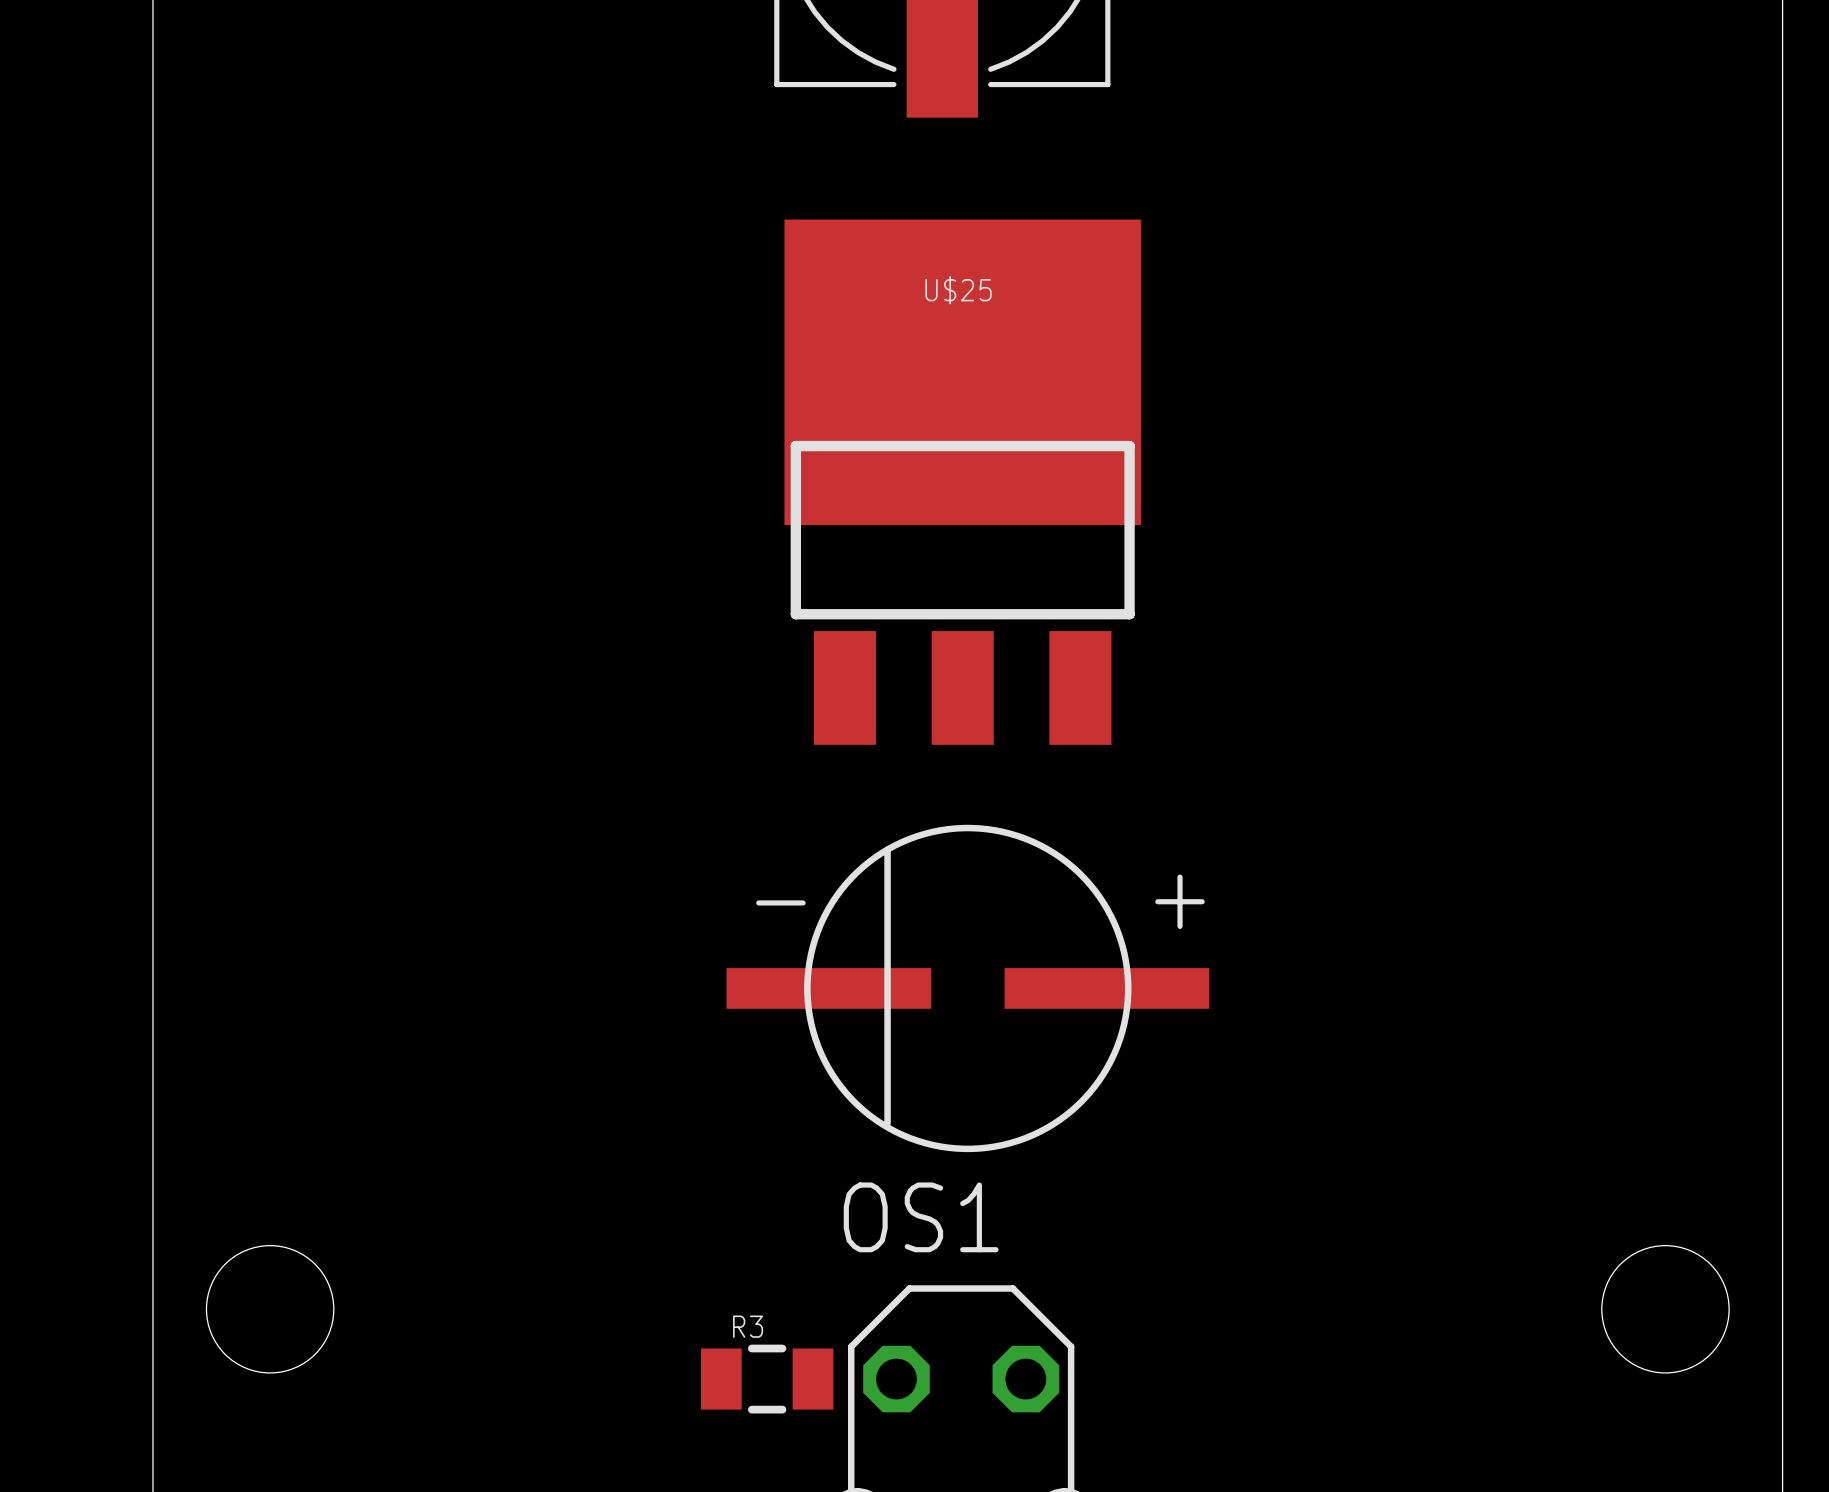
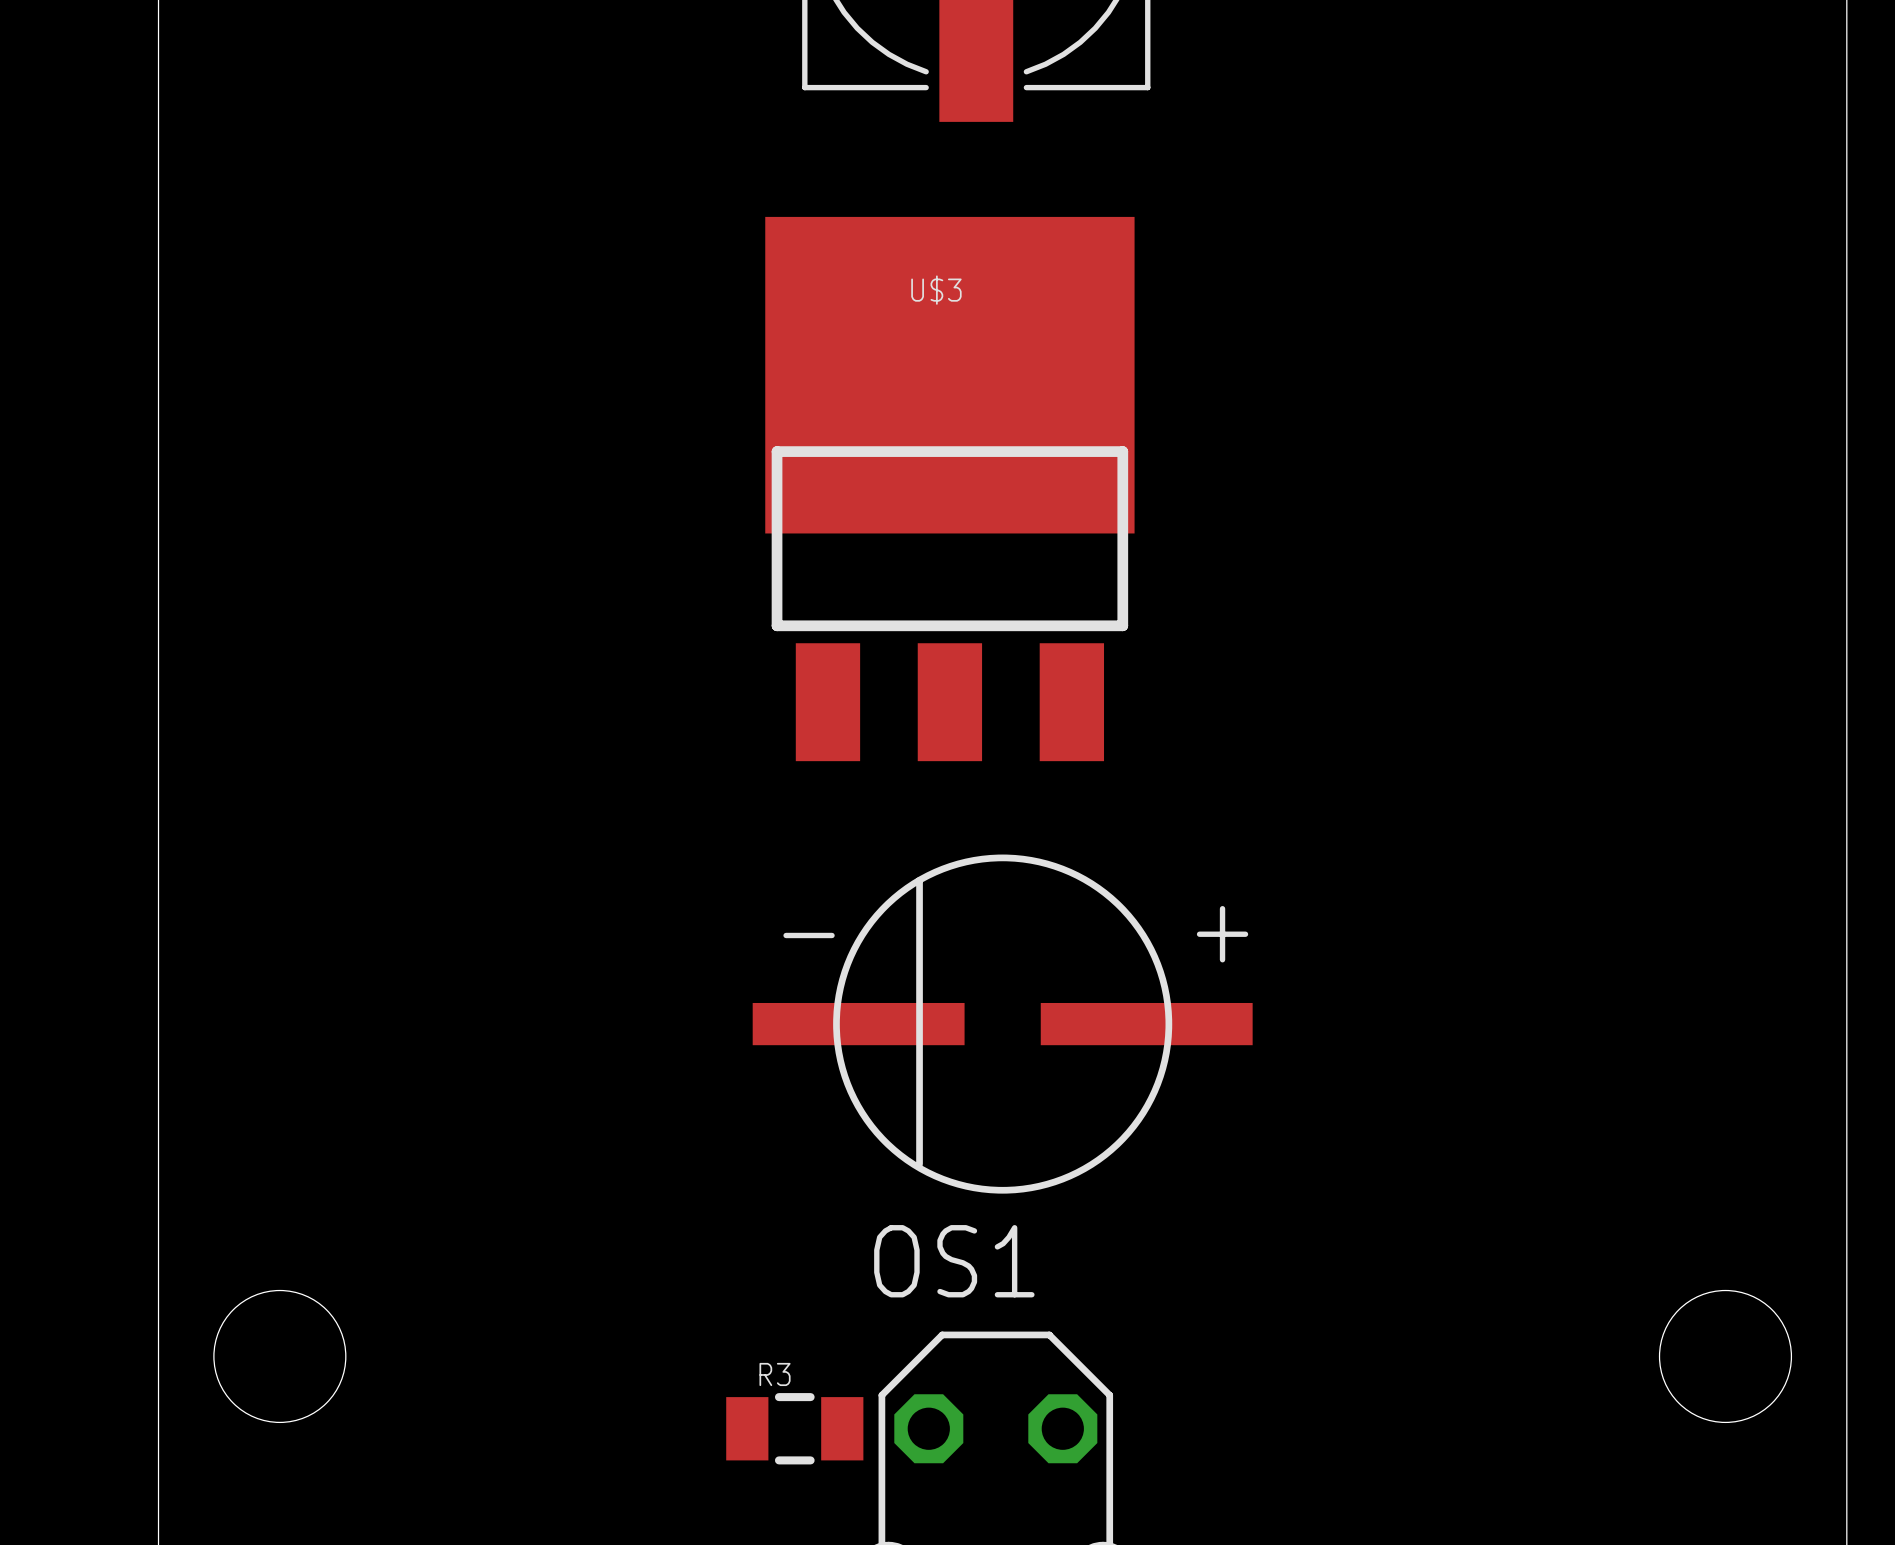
U$25 name: U$25 (958, 290) -> U$3 (936, 290)
U$25 position: (962, 482) -> (949, 489)

